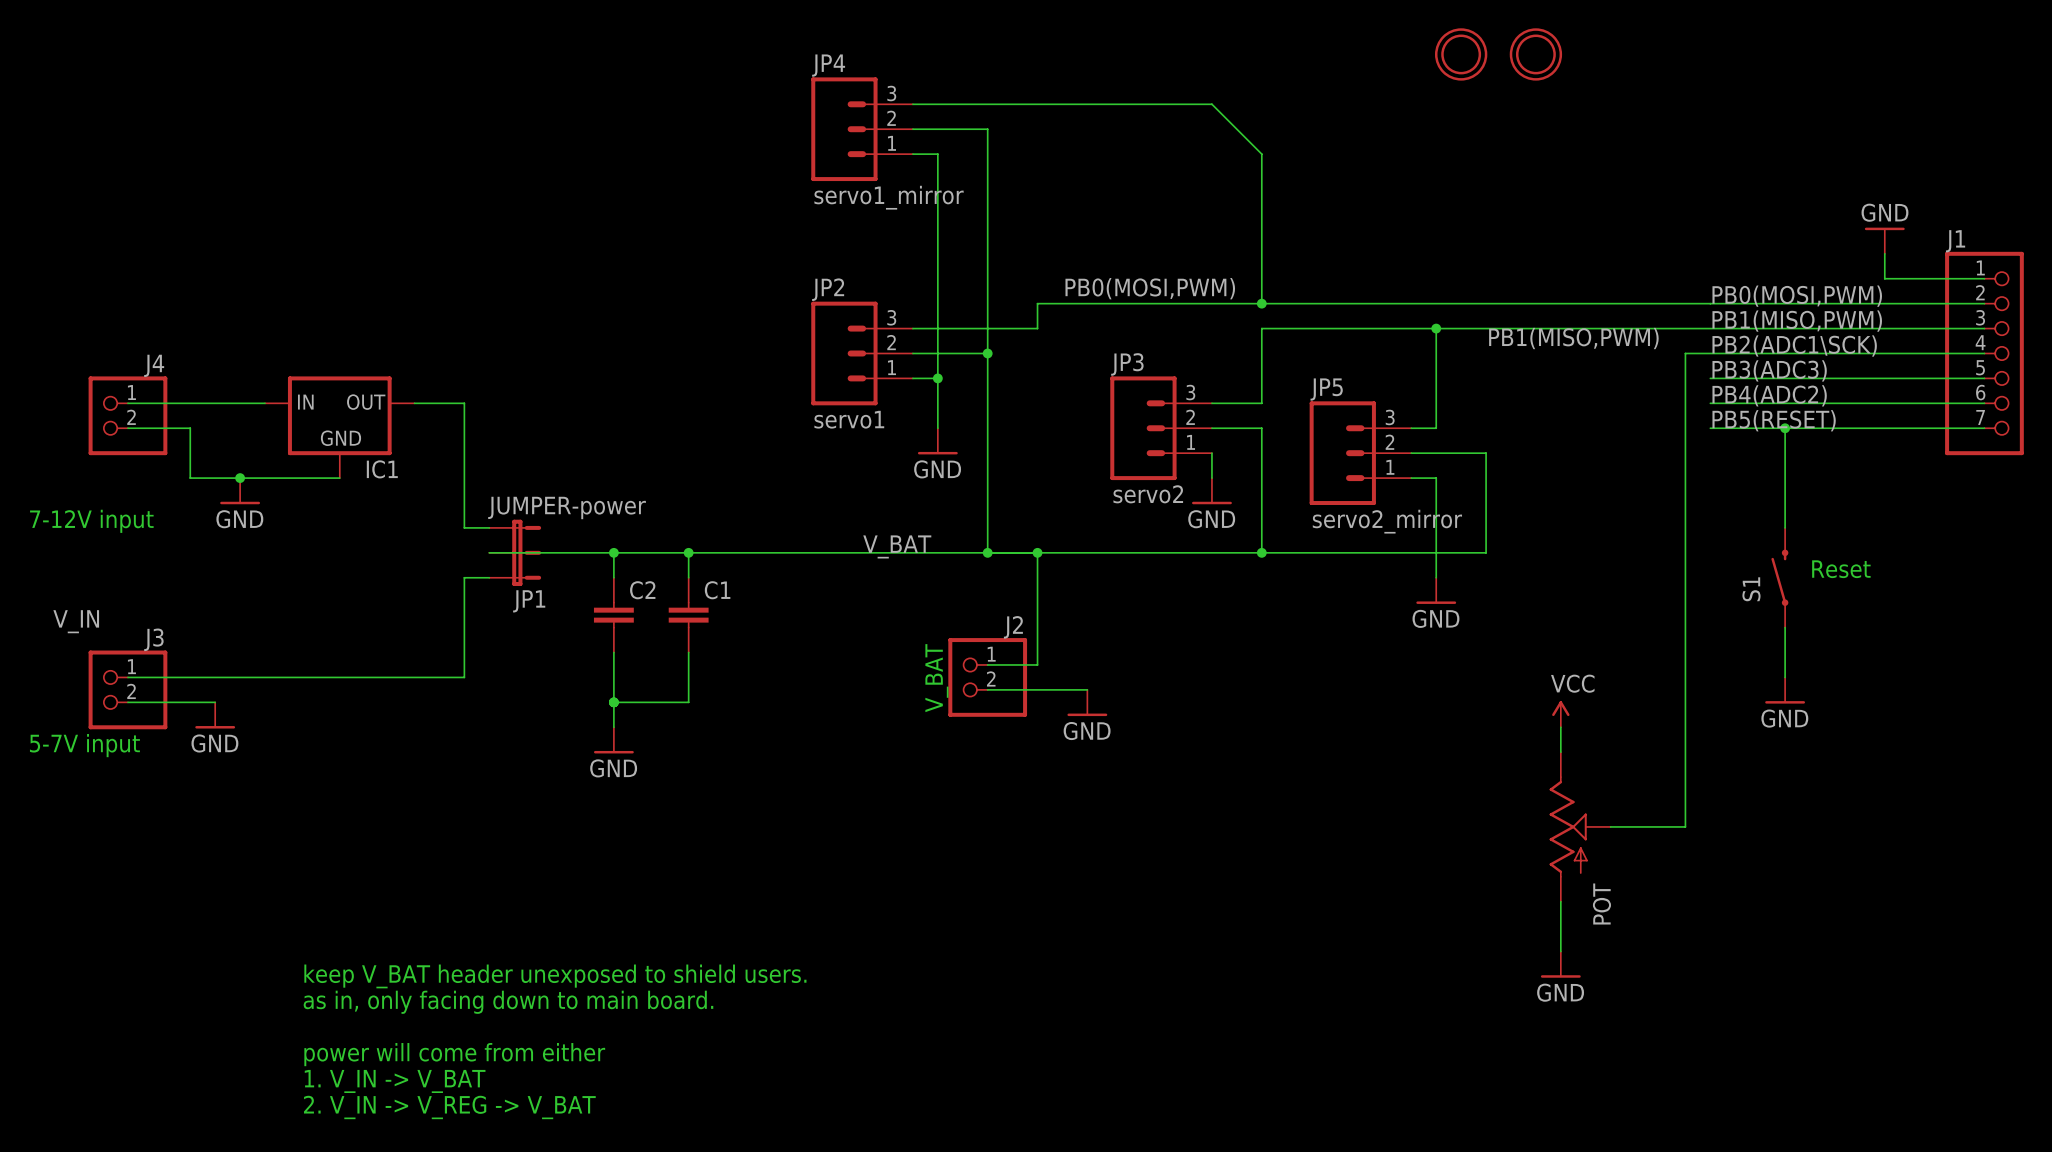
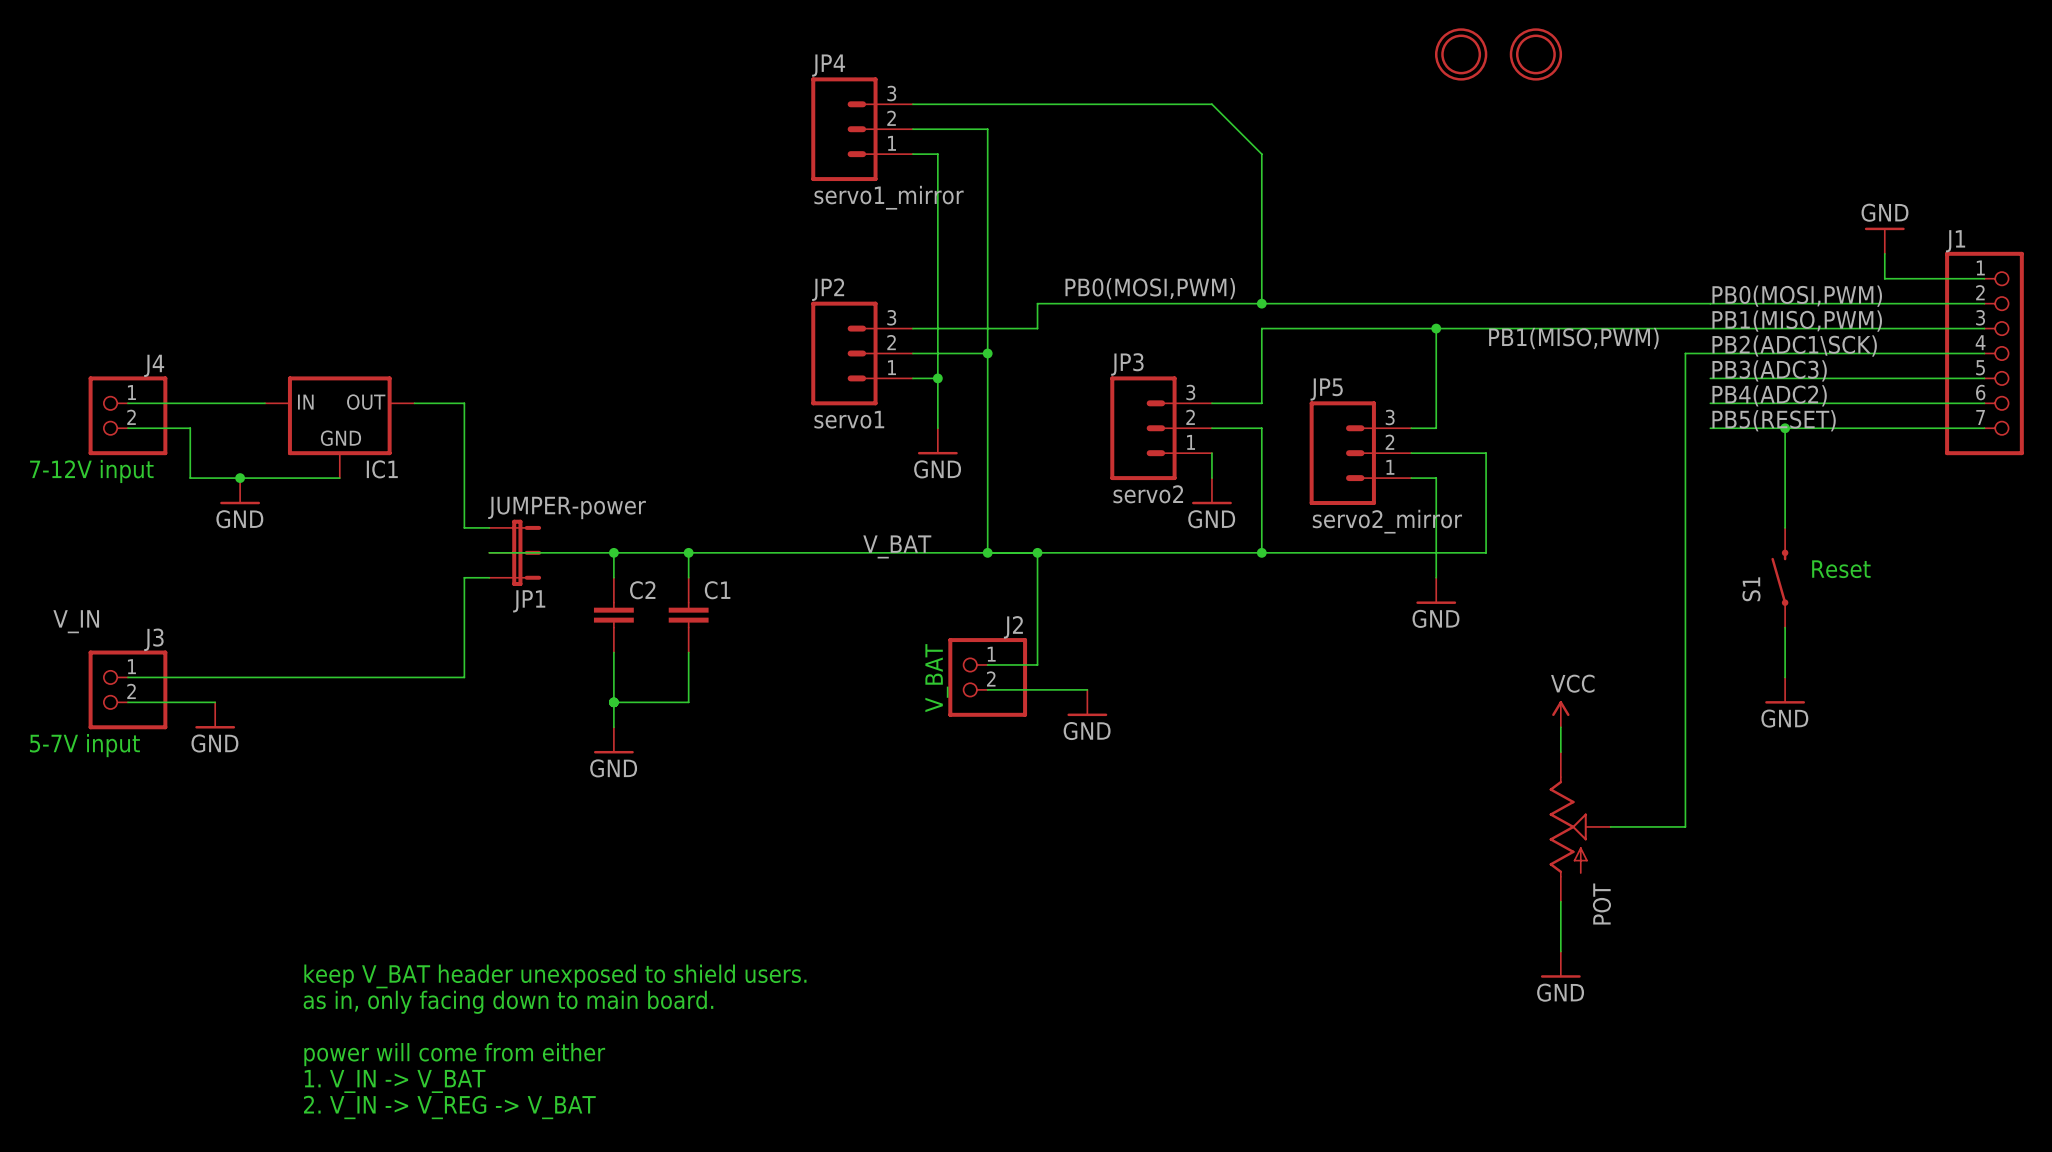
text position: 7-12V input (91, 521) -> 7-12V input (91, 471)

